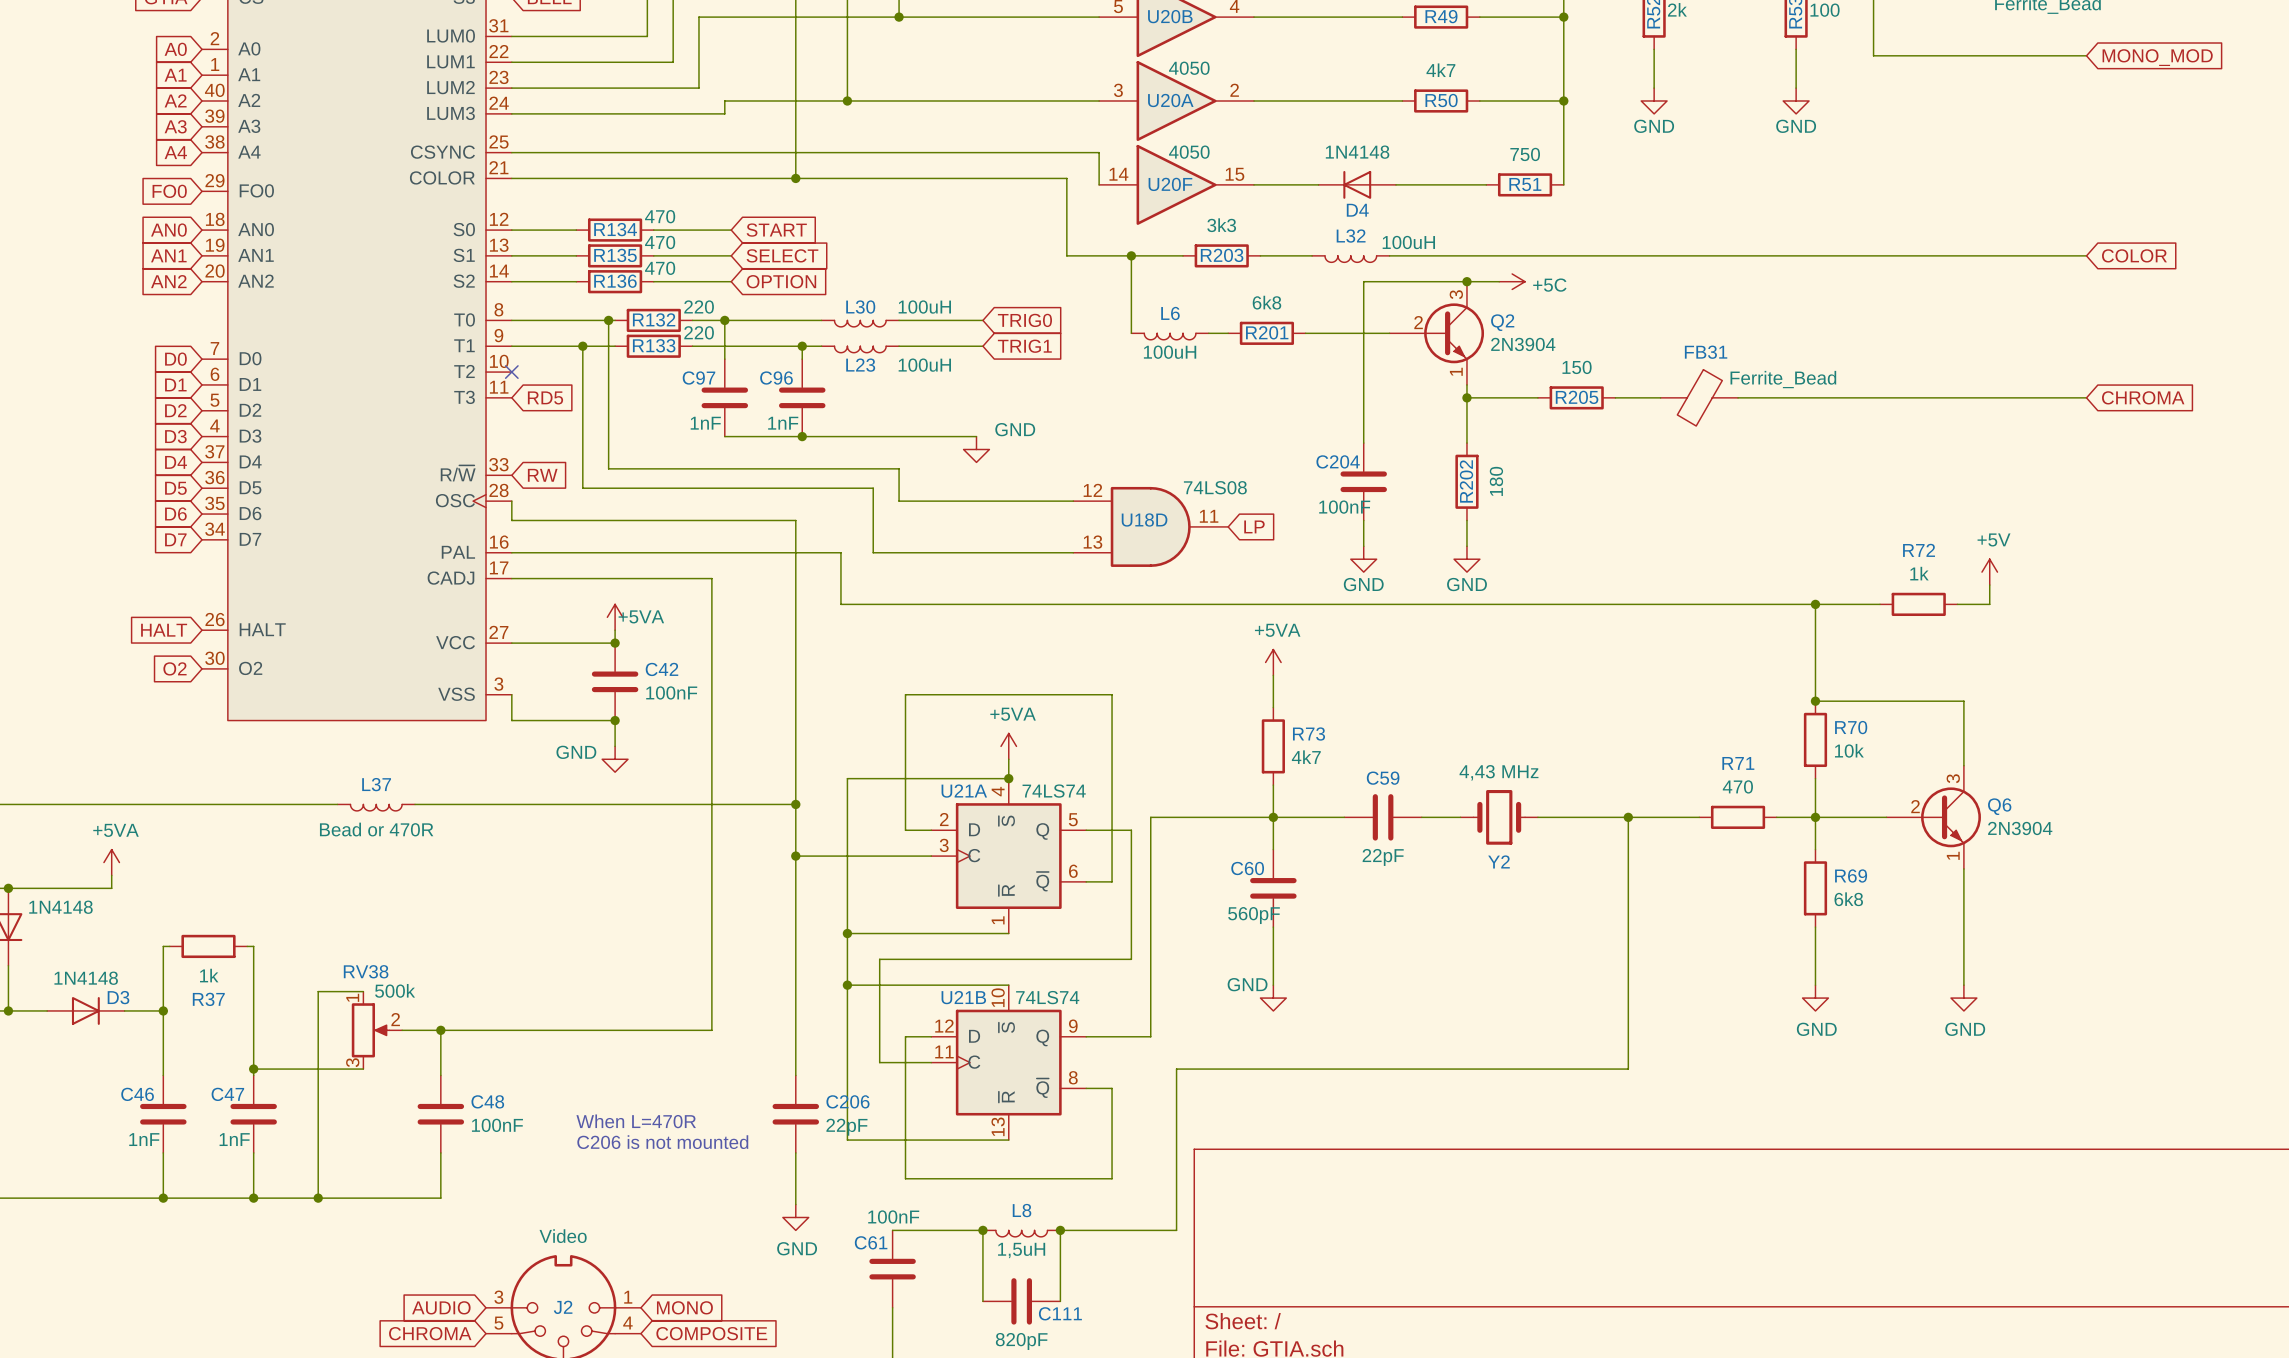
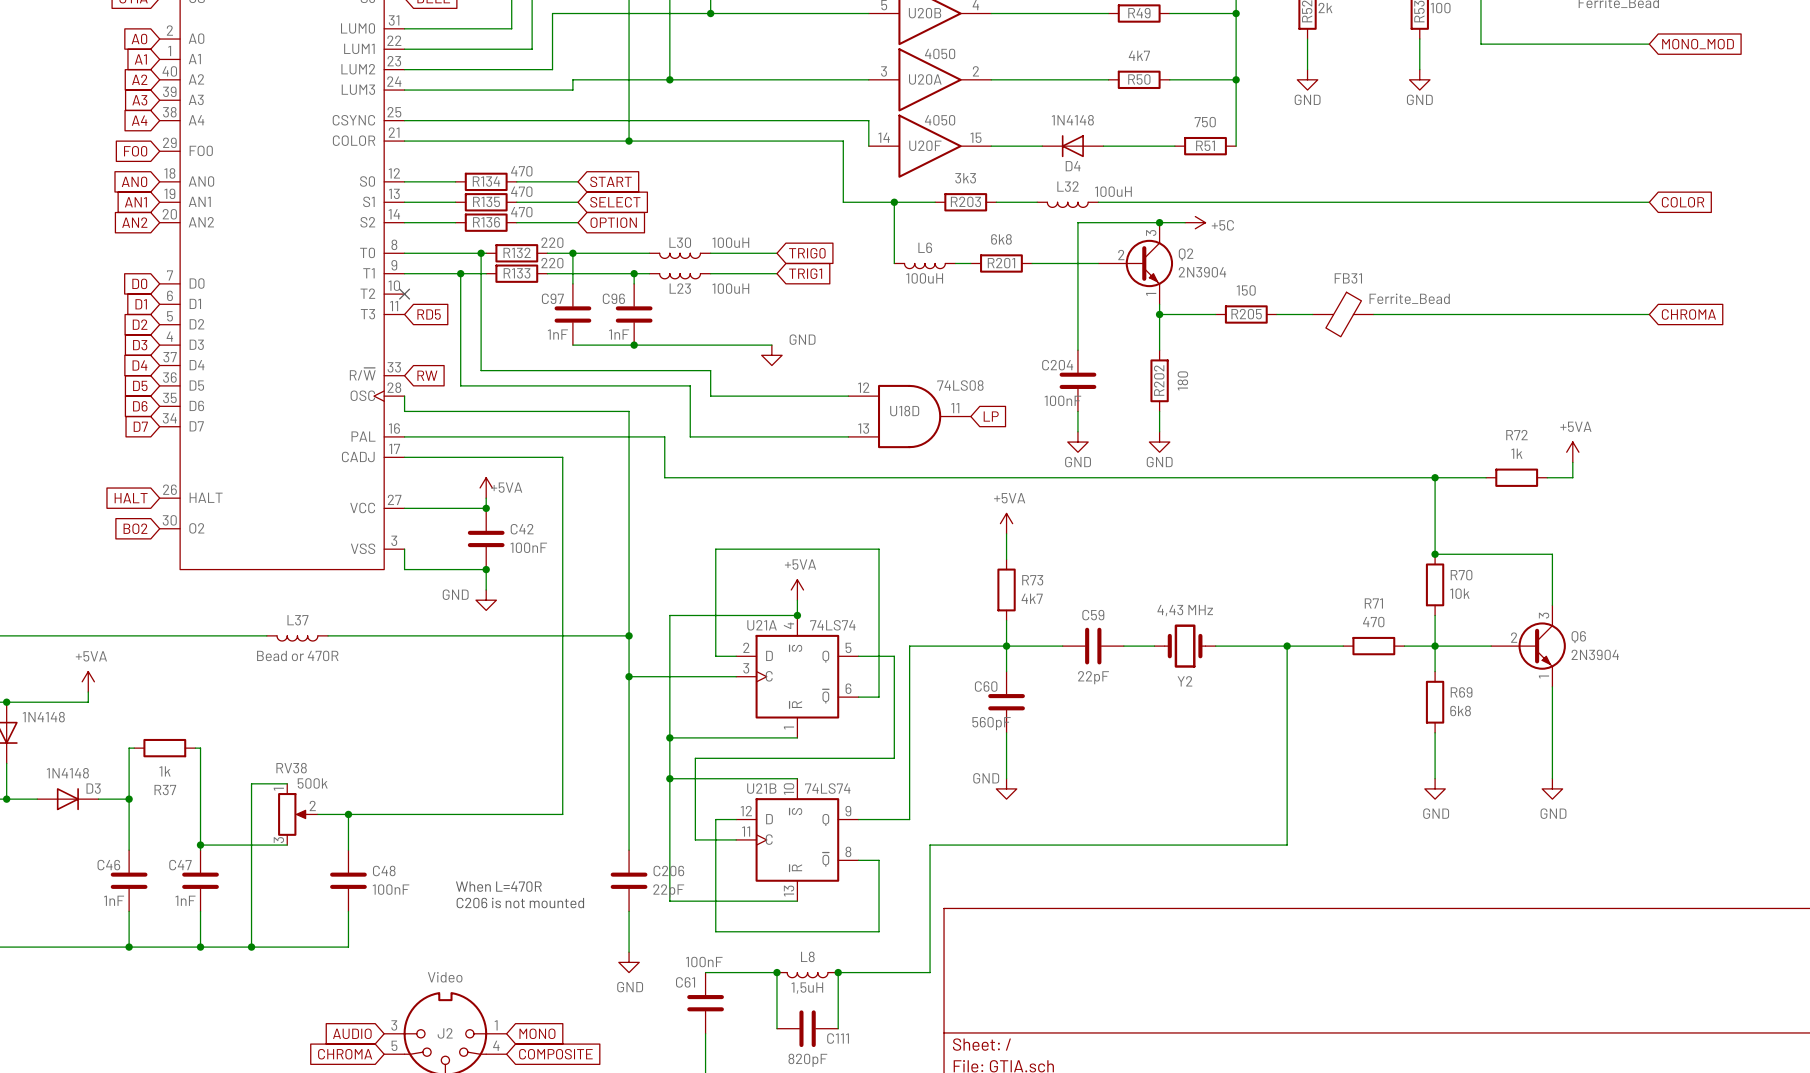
power symbol: +5V (1989, 572) -> +5VA (1572, 452)
global label: O2 (174, 668) -> BO2 (135, 528)

